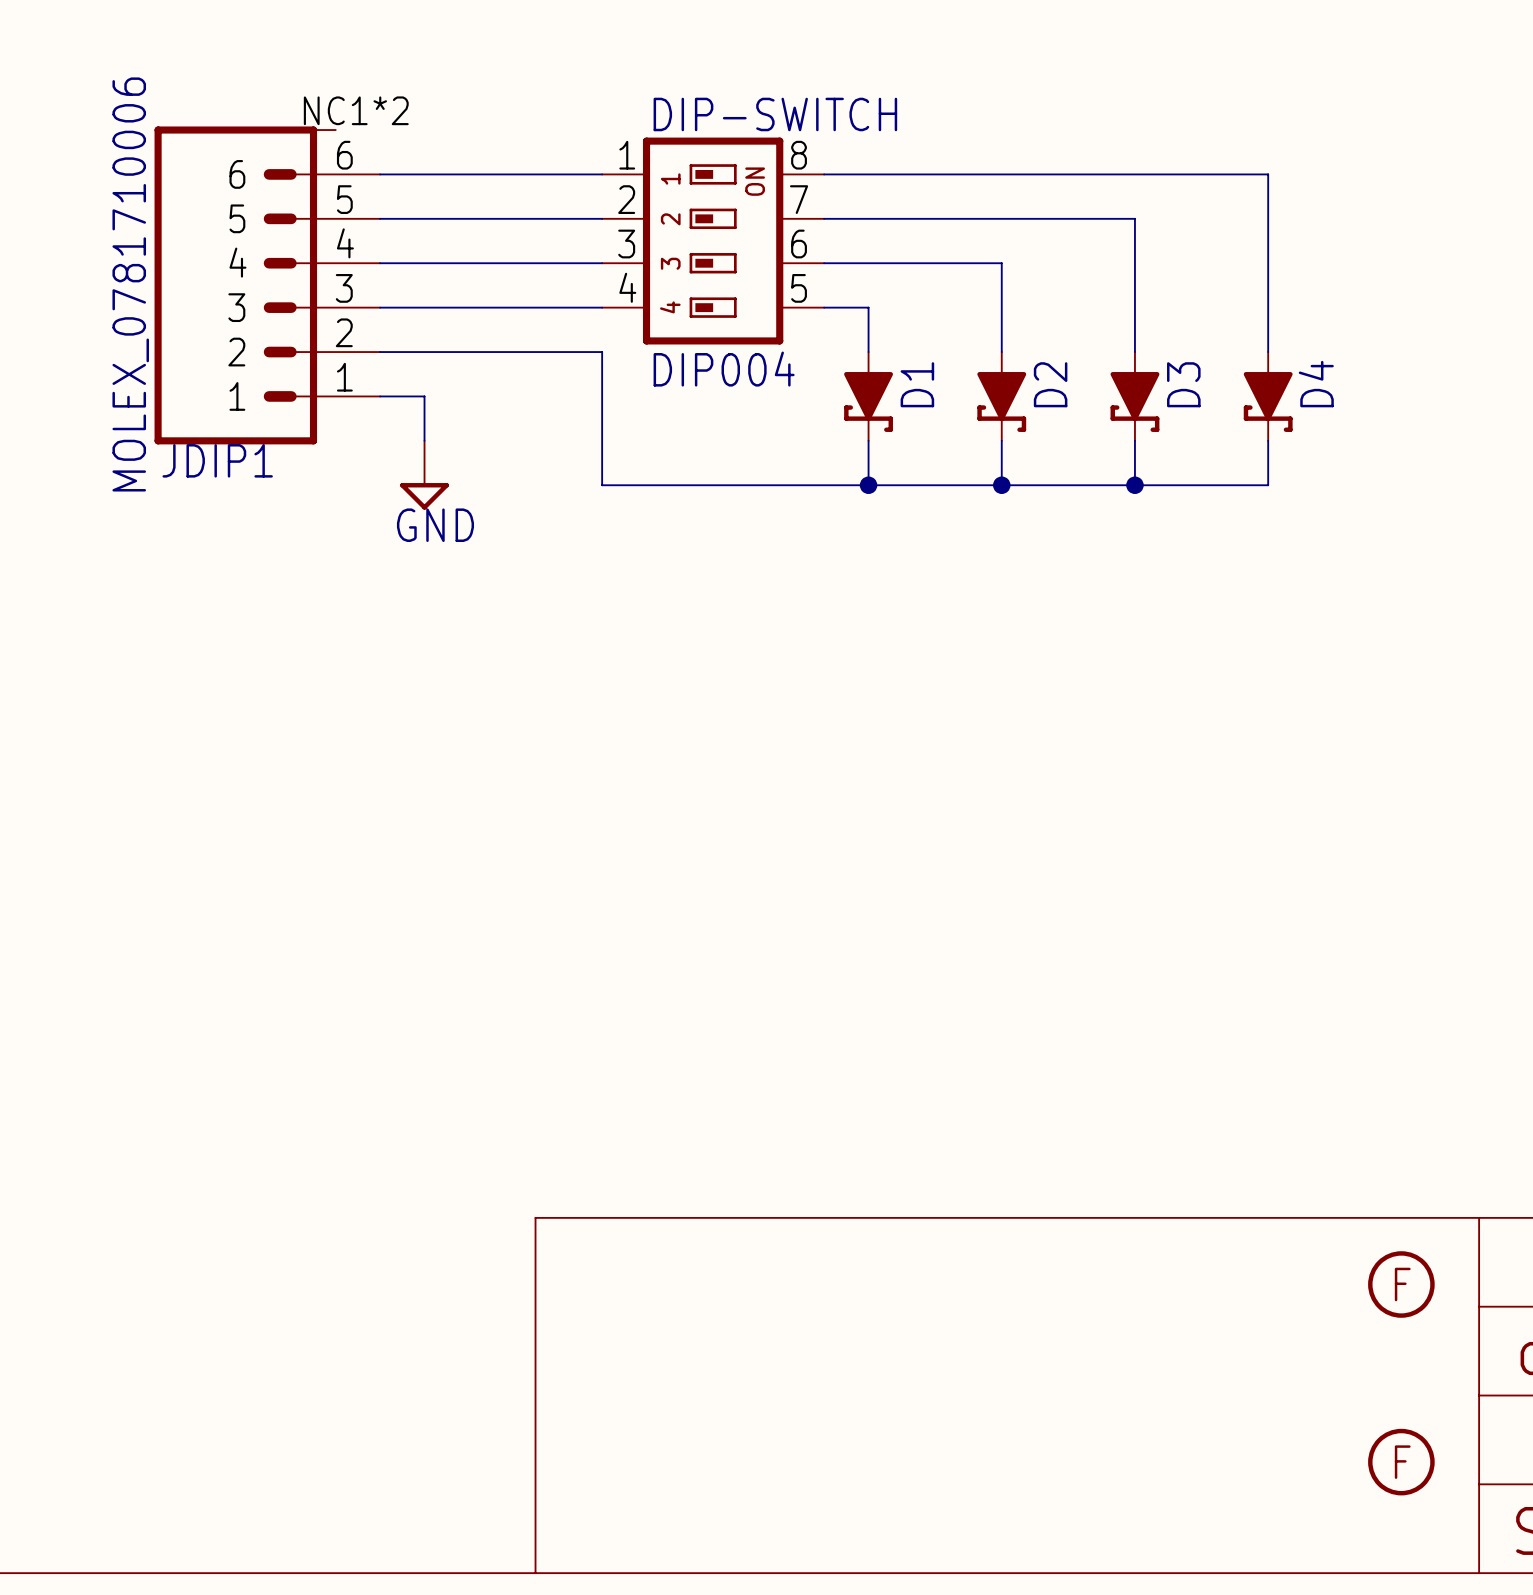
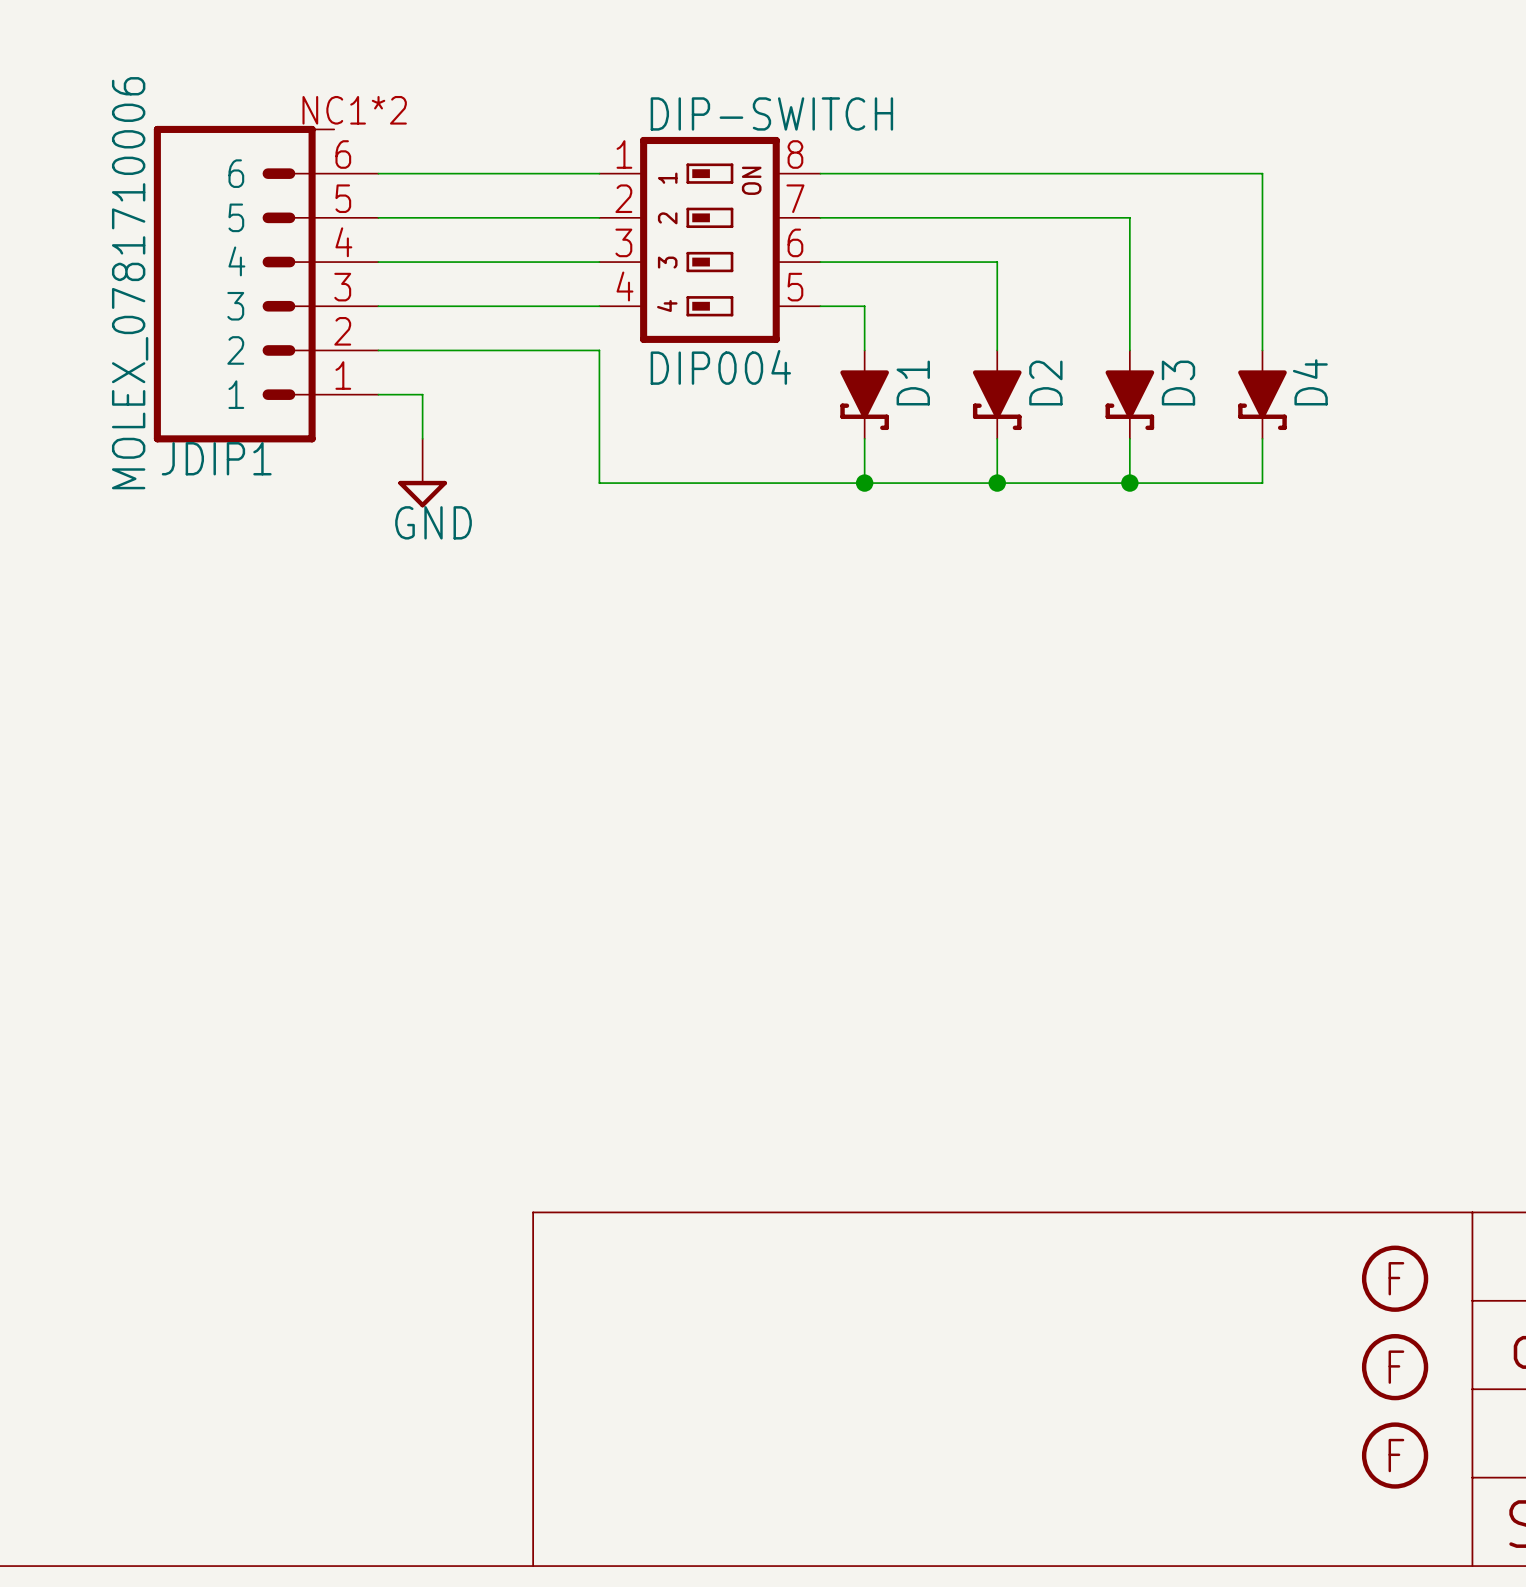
part: none -> (1395, 1367)

